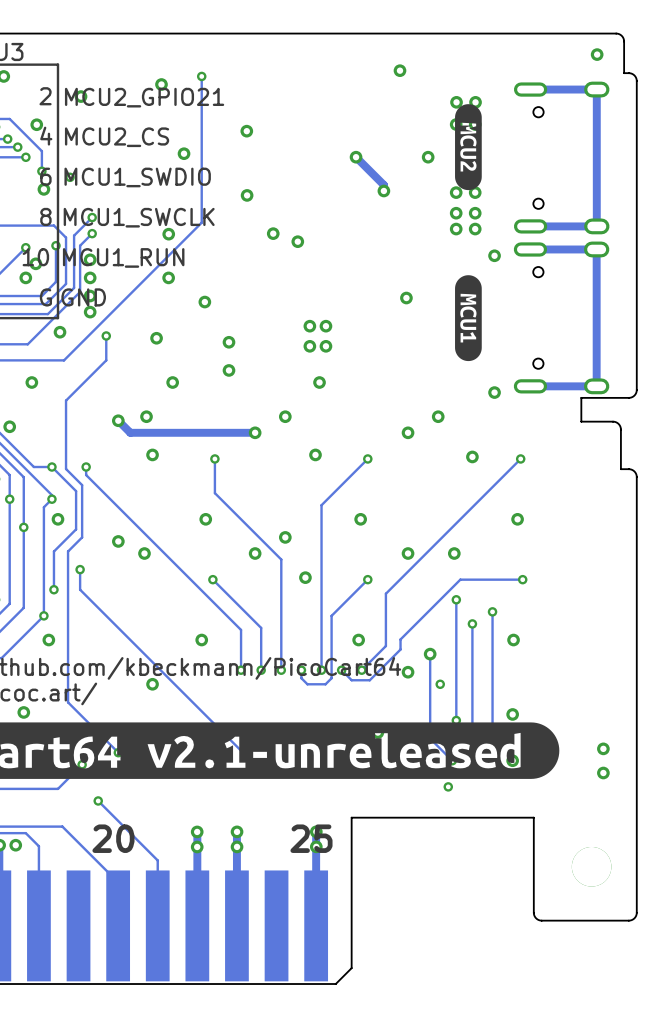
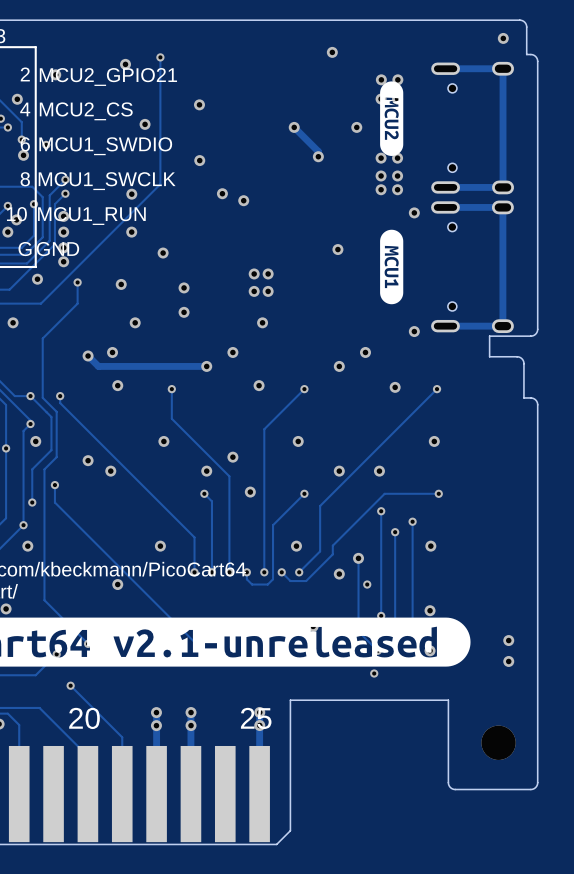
track: (212, 579) (261, 627) -> (204, 493) (211, 501) (211, 535)
via position: (212, 579) -> (204, 493)

